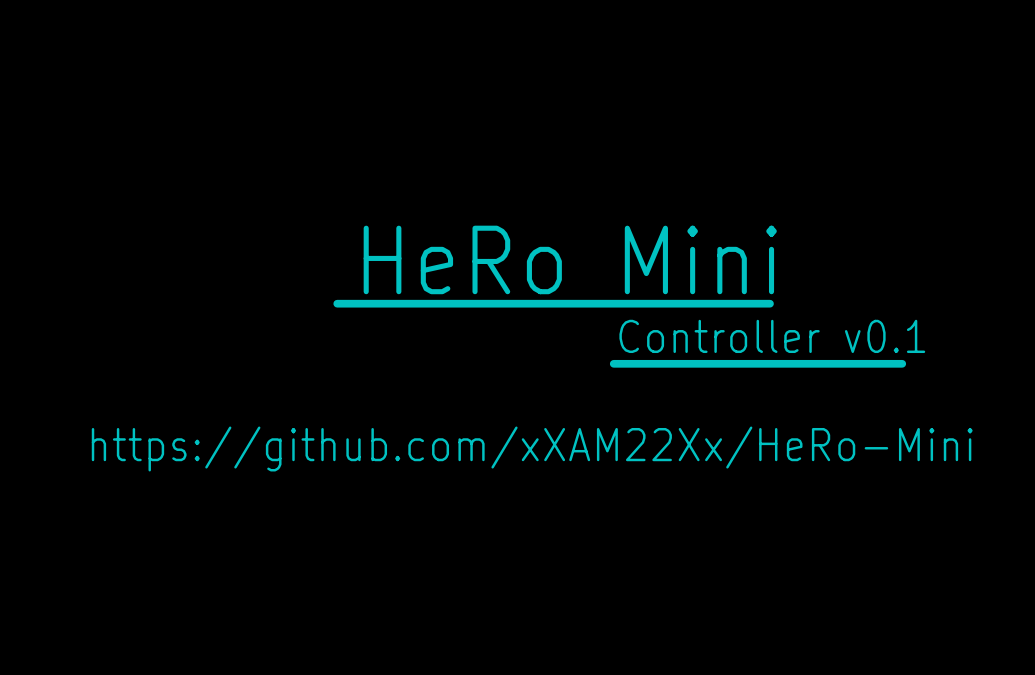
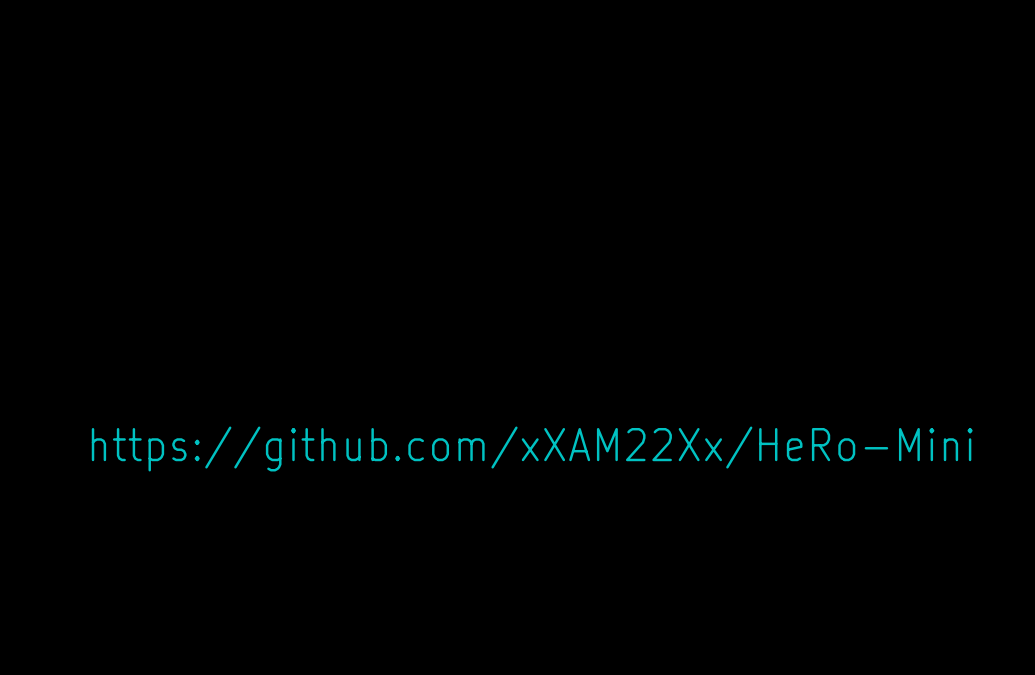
text: HeRo Mini (570, 259) -> none
line: (337, 303) (770, 303) -> none
text: Controller v0.1 (772, 336) -> none
line: (613, 363) (902, 363) -> none

